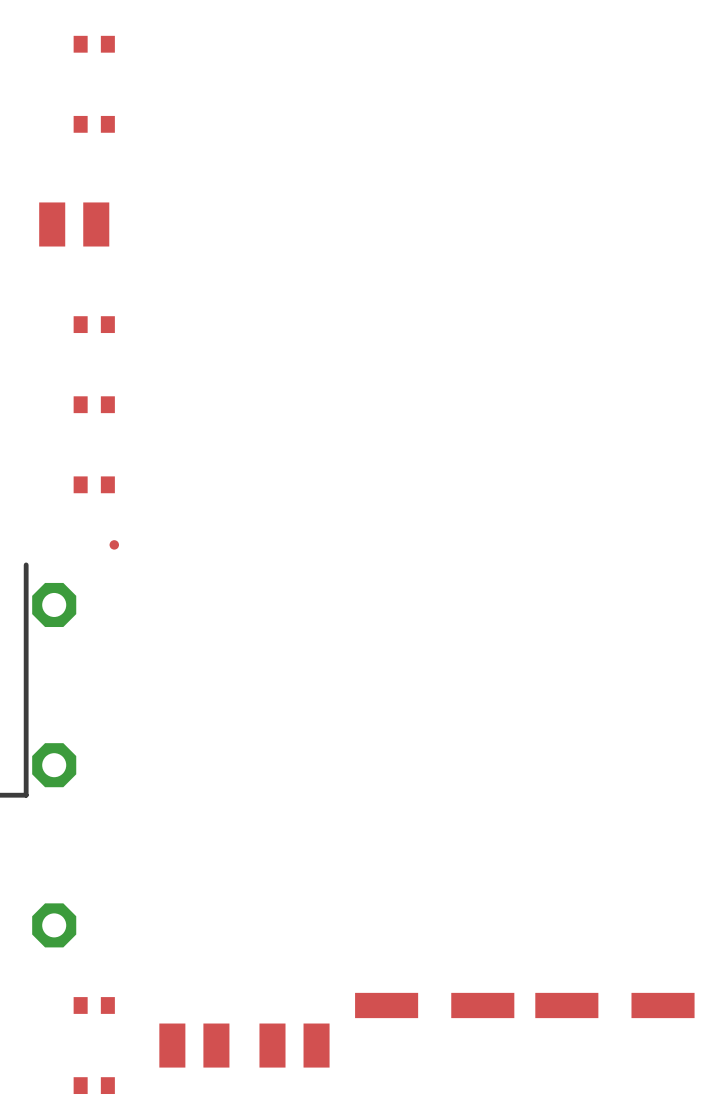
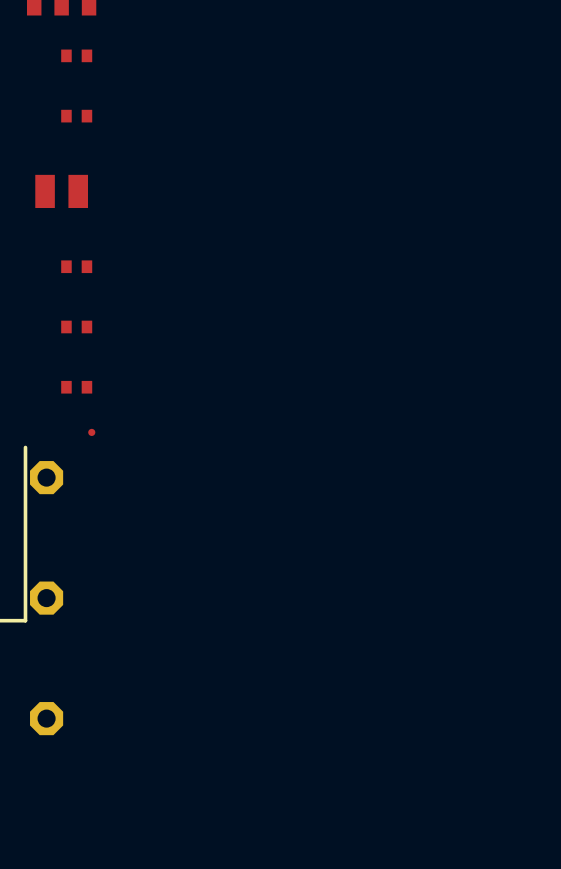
part: (94, 1005) -> none
part: (434, 1005) -> none
part: (614, 1005) -> none
part: (194, 1045) -> none
part: (294, 1045) -> none
part: (94, 1085) -> none

